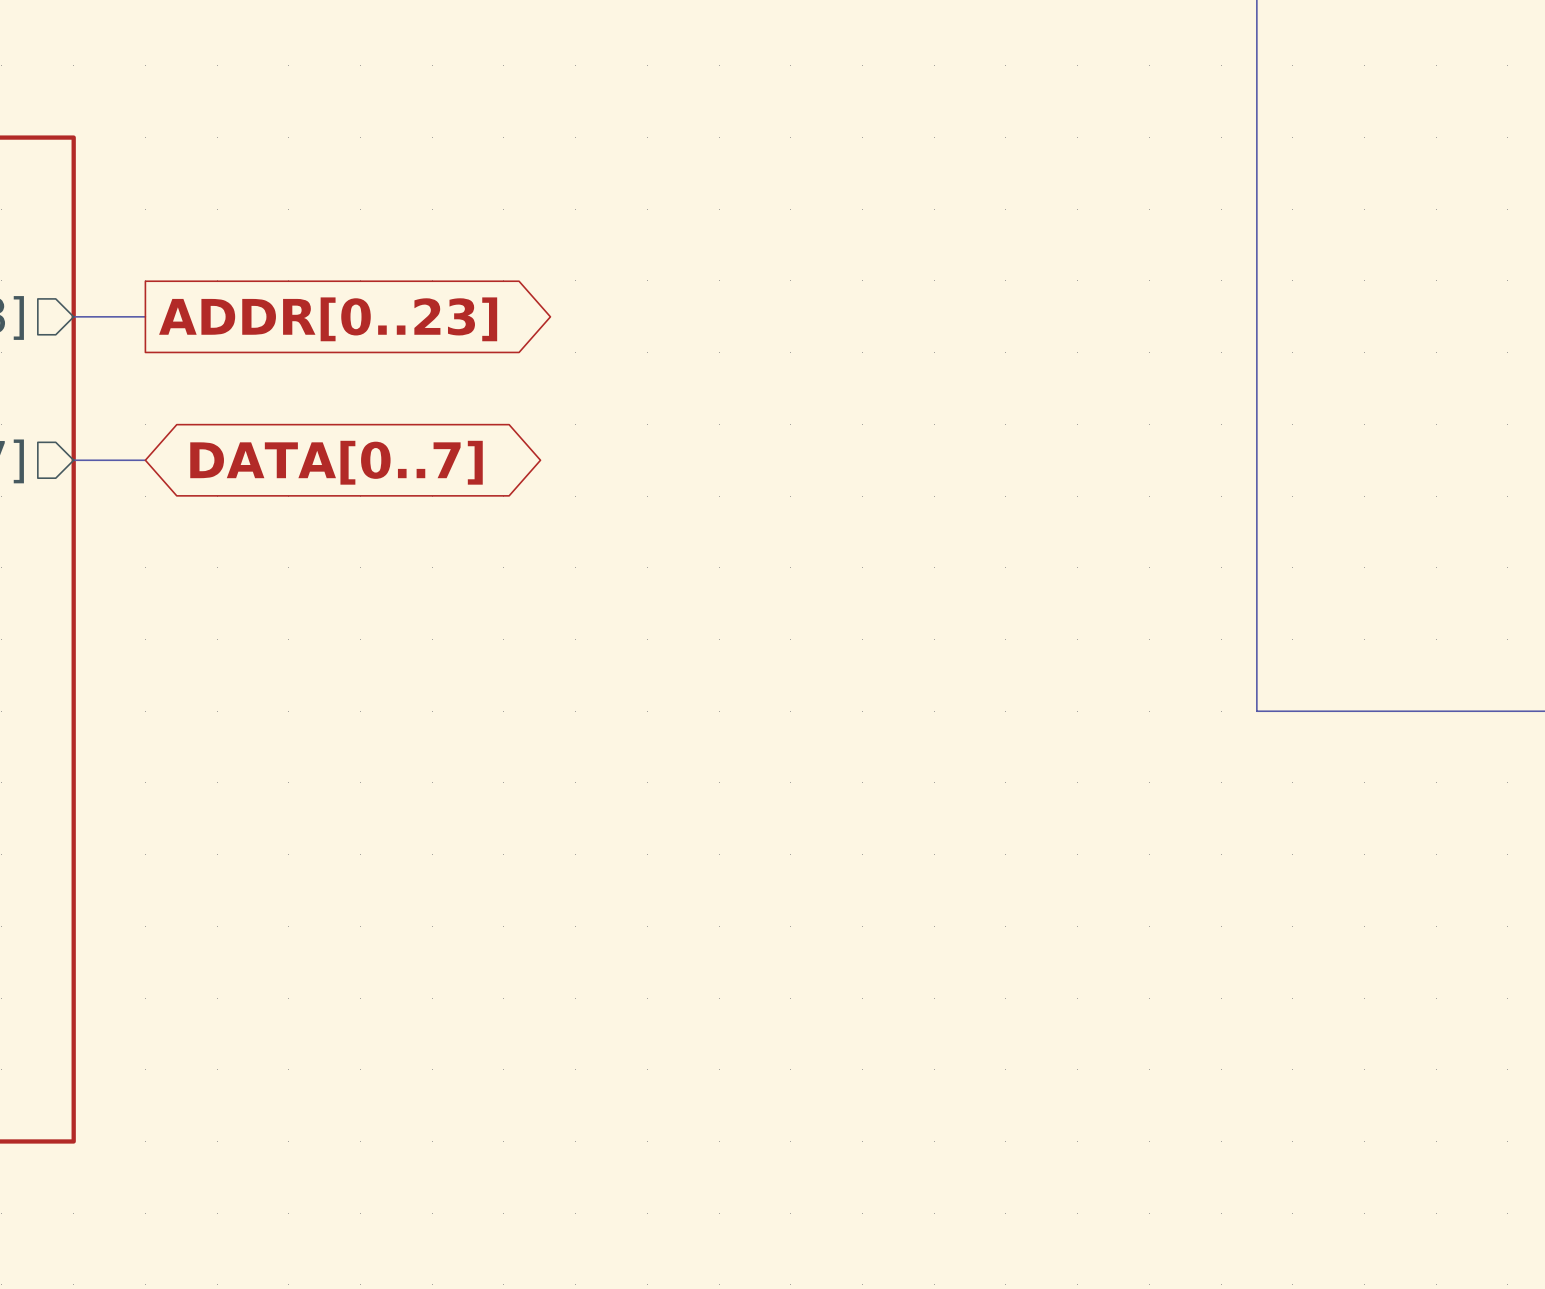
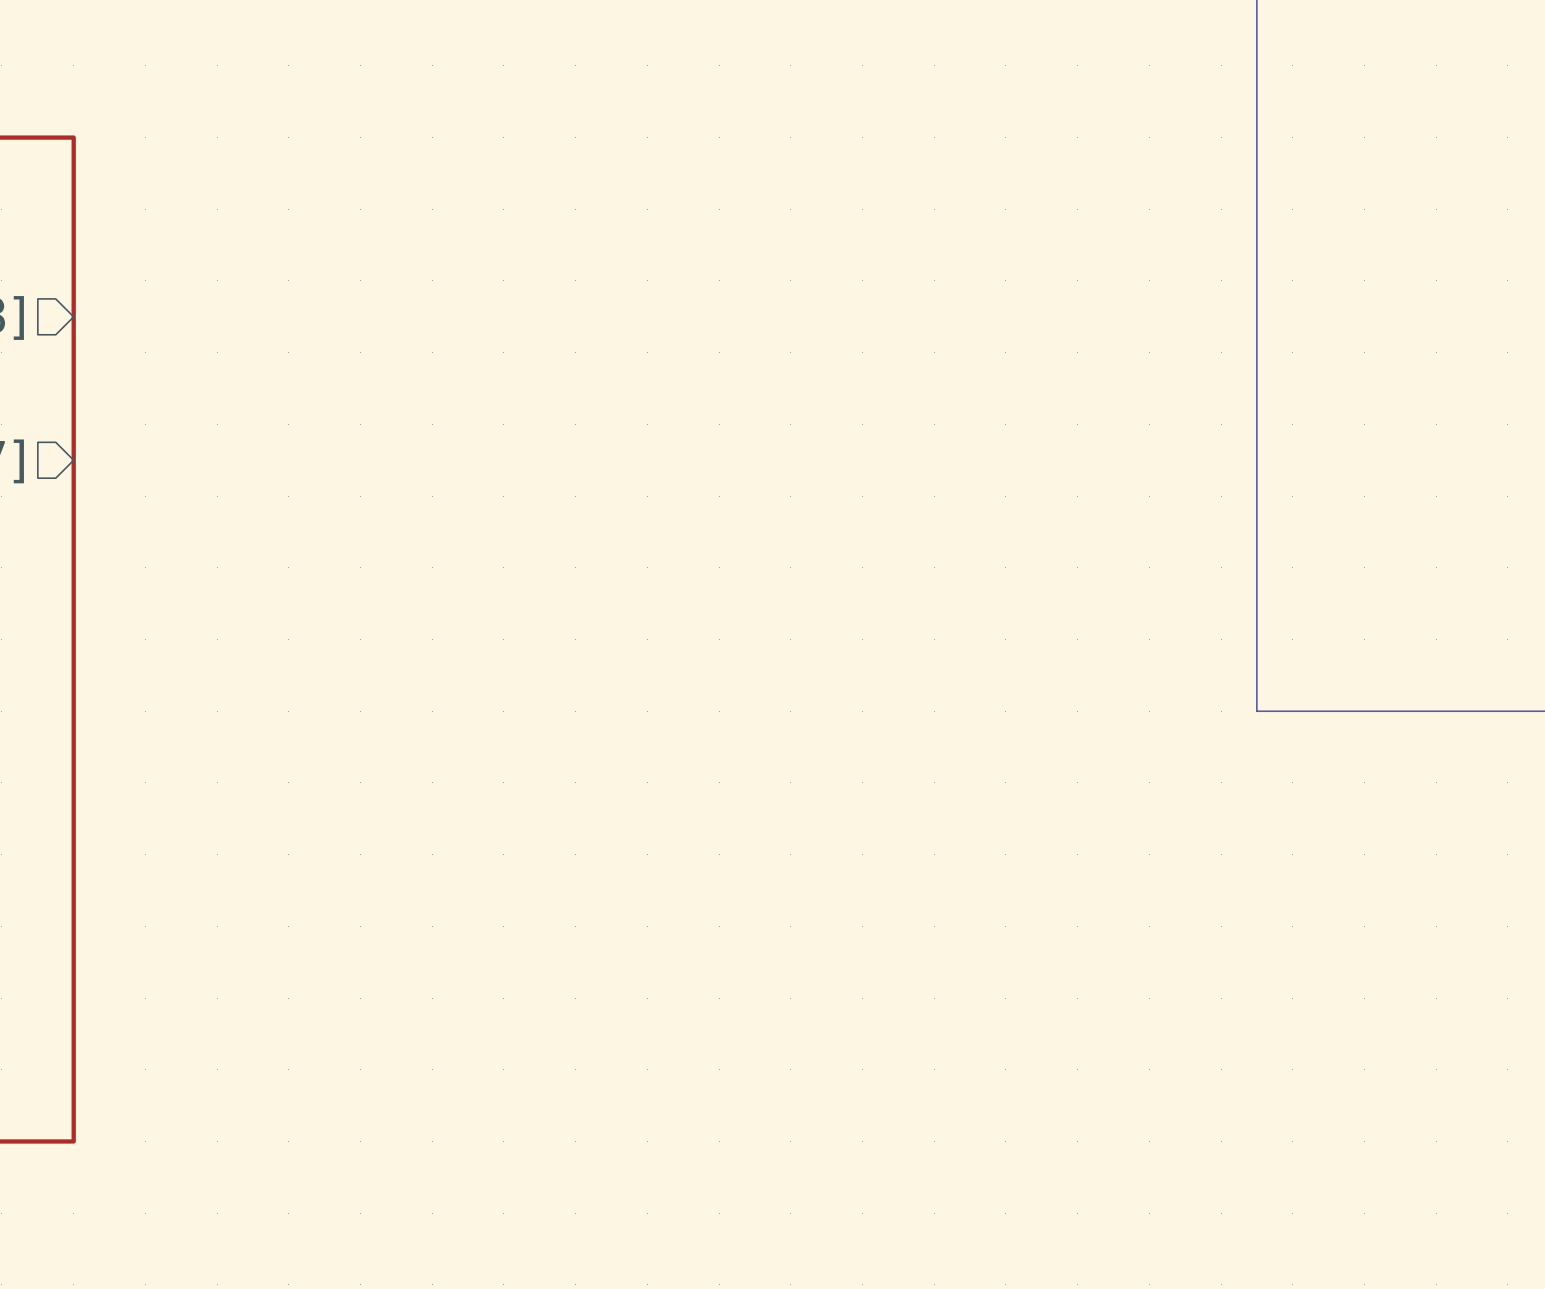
bus: (73, 316) (145, 316) -> none
global label: ADDR[0..23] (328, 319) -> none
bus: (73, 460) (145, 460) -> none
global label: DATA[0..7] (336, 462) -> none

